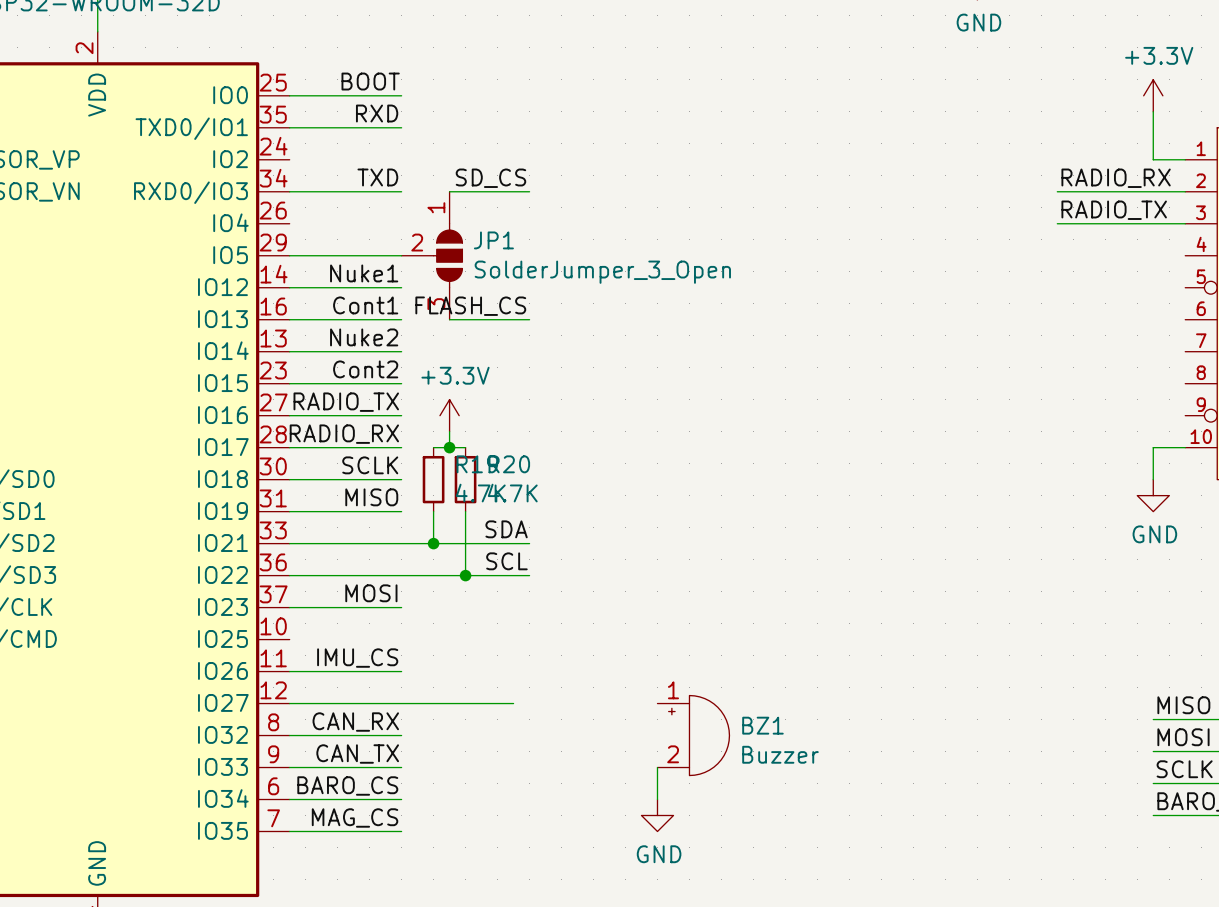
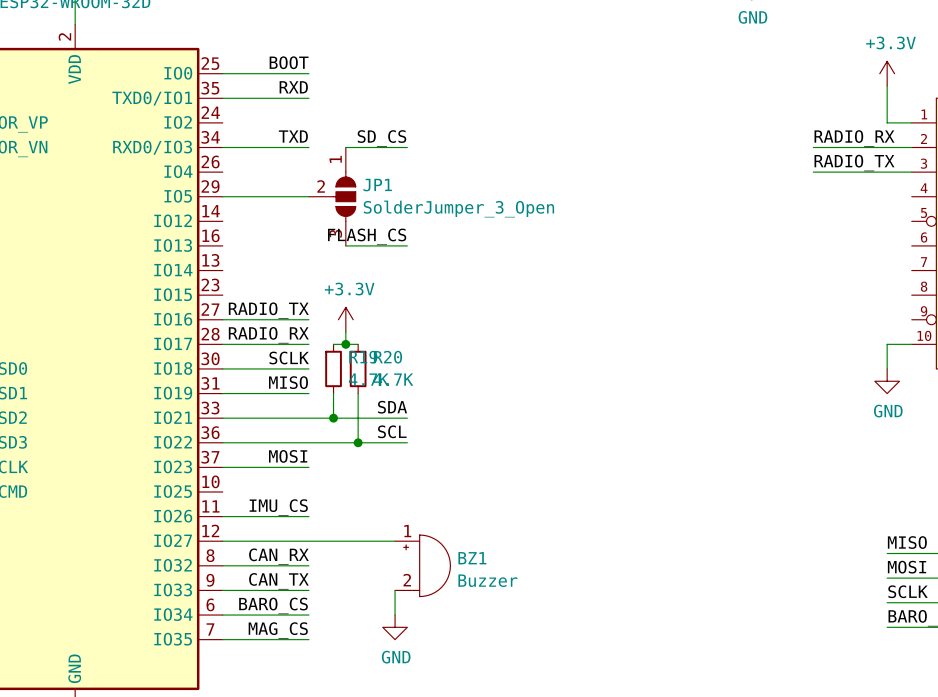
label: Nuke1 (364, 273) -> none
wire: (289, 287) (401, 287) -> none
label: Cont1 (365, 305) -> none
wire: (289, 319) (401, 319) -> none
label: Nuke2 (364, 337) -> none
wire: (289, 351) (401, 351) -> none
label: Cont2 (365, 369) -> none
wire: (289, 383) (401, 383) -> none
BZ1 position: (693, 735) -> (422, 565)
wire: (657, 767) (657, 799) -> (395, 590) (395, 615)
power symbol position: GND (657, 815) -> GND (395, 627)

